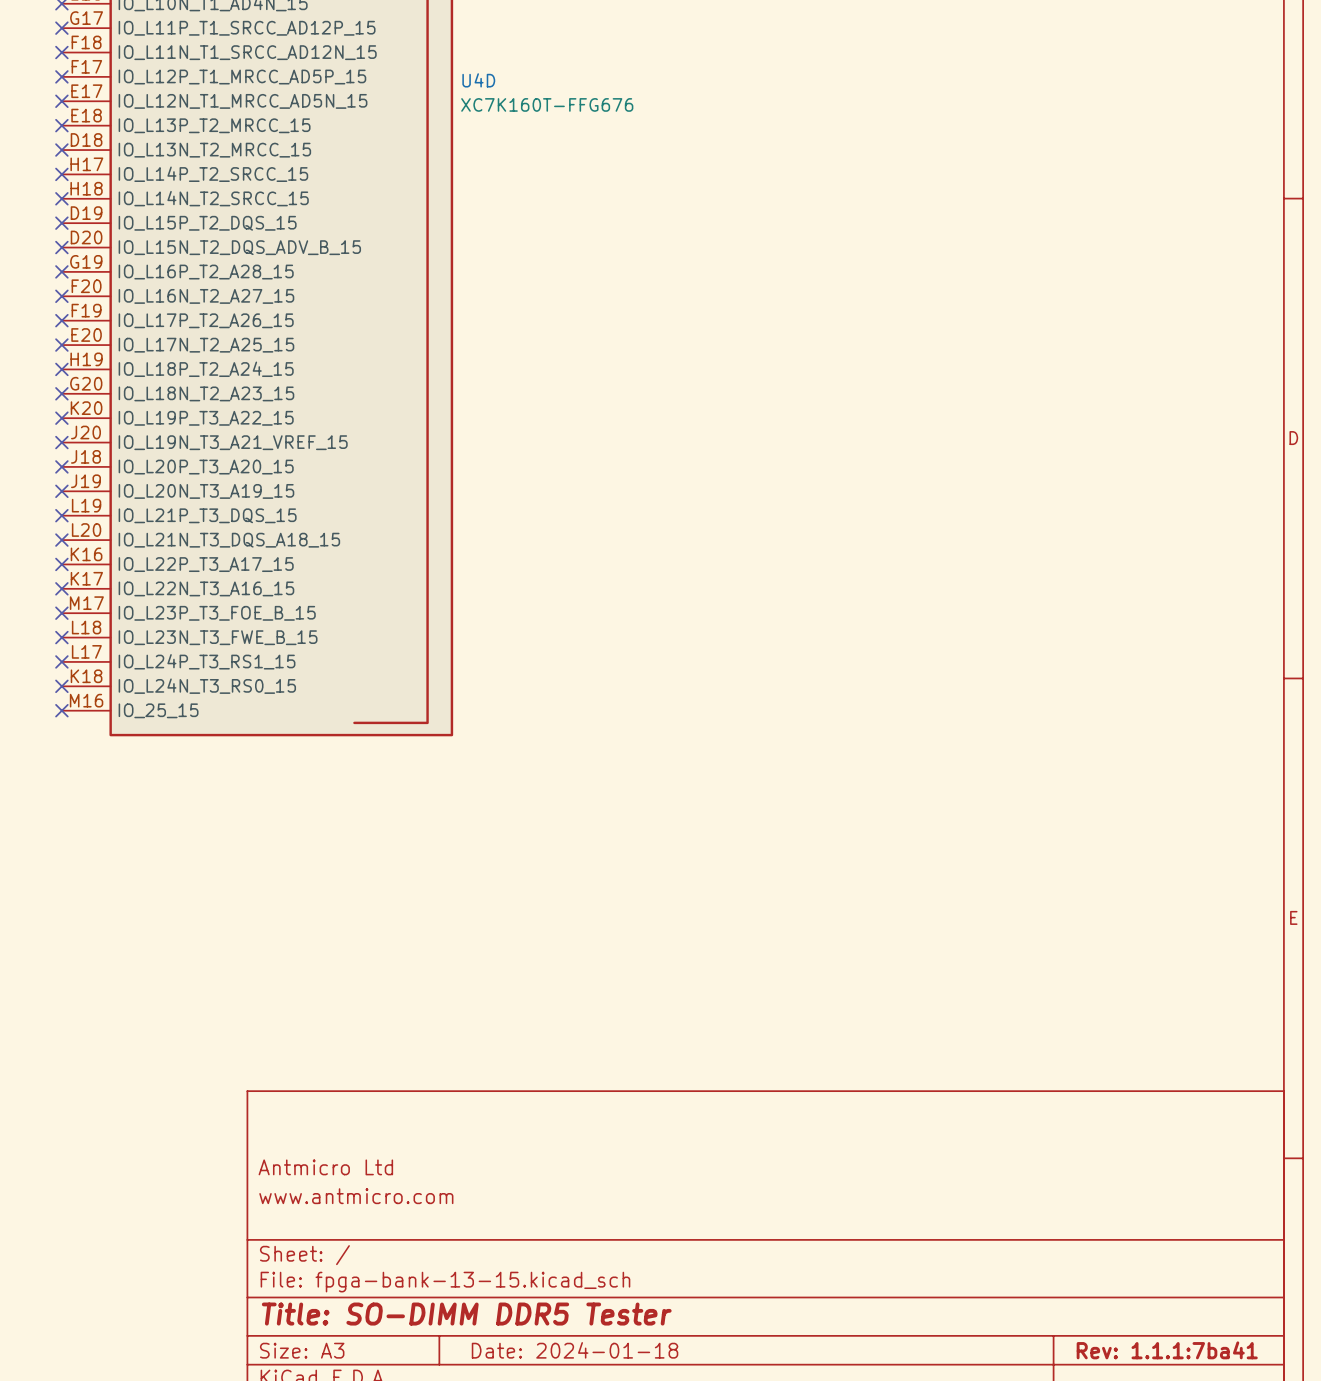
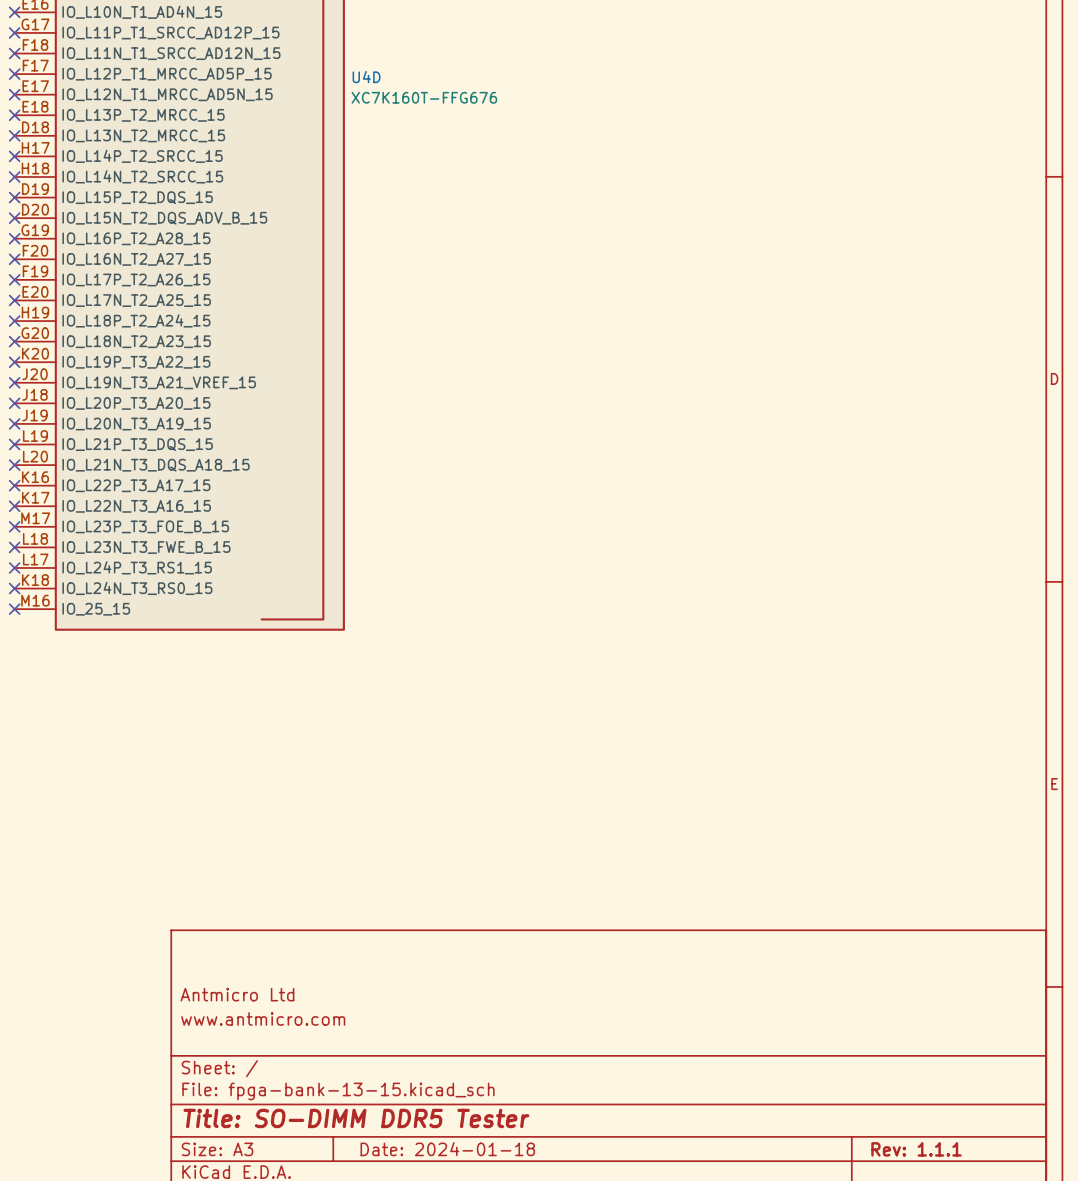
title block: Rev: 1.1.1:7ba41 (1167, 1350) -> Rev: 1.1.1 (916, 1149)

